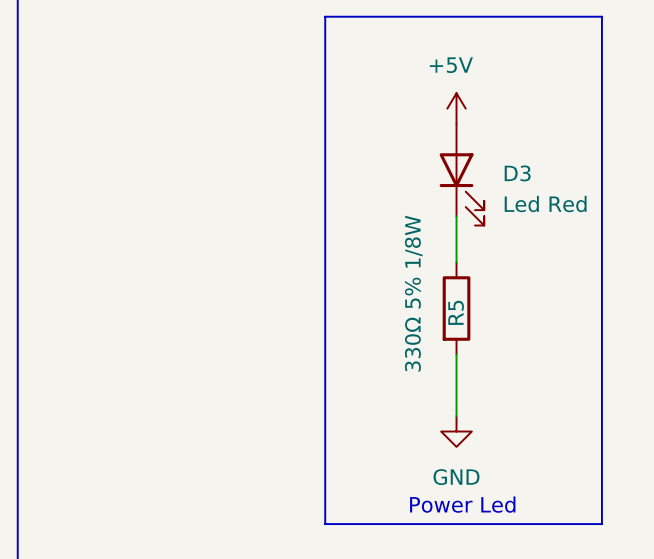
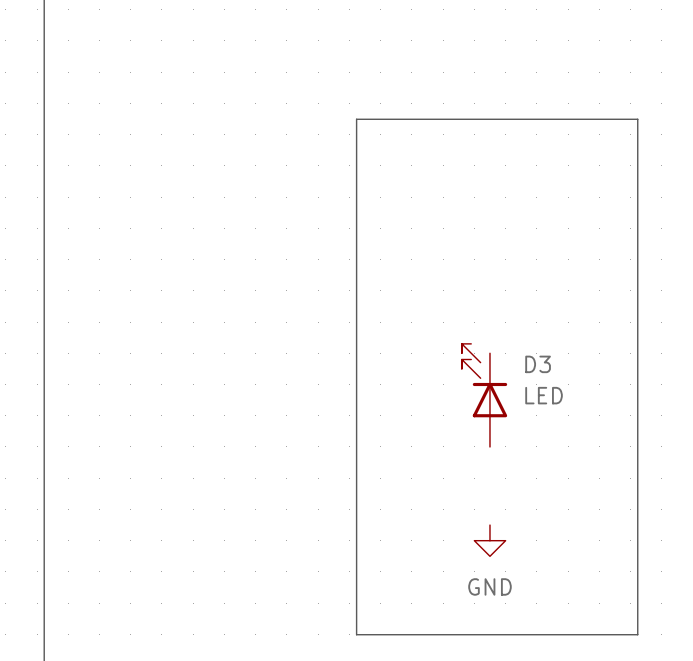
power symbol: +5V (456, 108) -> none
D3 name position: D3 (517, 173) -> D3 (538, 364)
D3 position: (461, 174) -> (484, 395)
D3 rotation: 0° (461, 189) -> 180° (484, 380)
D3 value: Led Red (545, 203) -> LED (544, 395)
wire: (456, 216) (456, 262) -> none
R5: 330Ω 5% 1/8W (456, 308) -> none
wire: (456, 354) (456, 416) -> none
text: Power Led (462, 504) -> none

